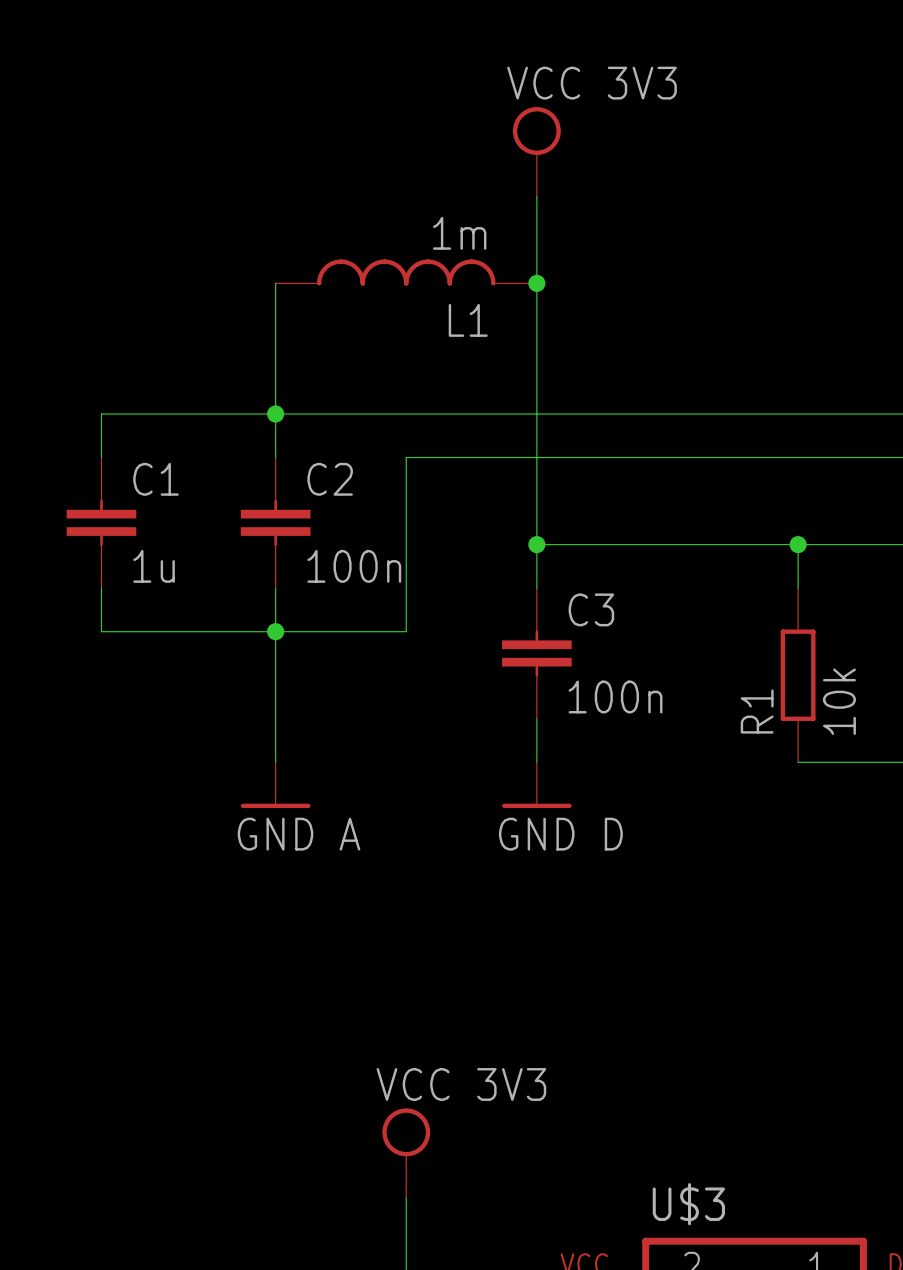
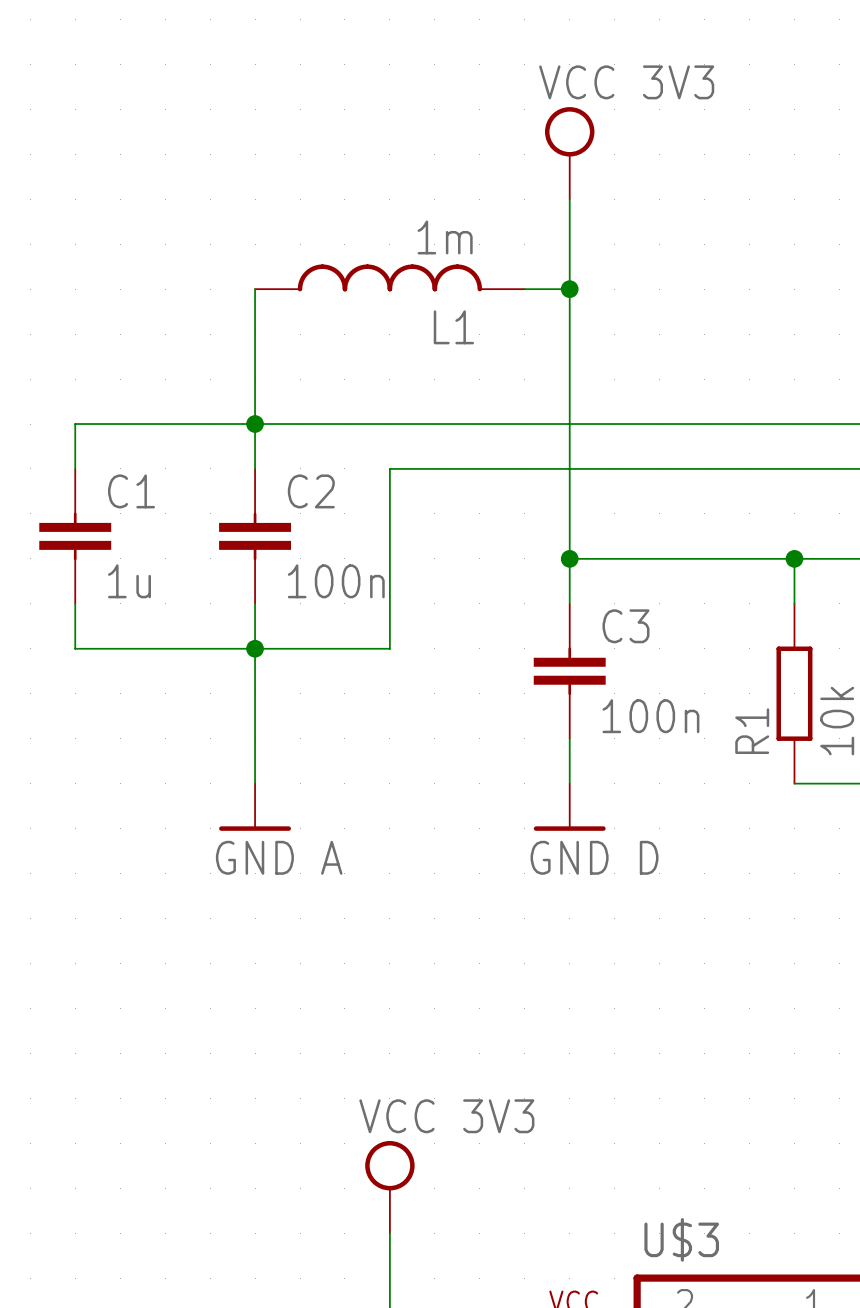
power symbol position: VCC 3V3 (536, 151) -> VCC 3V3 (569, 153)
wire: (536, 196) (536, 588) -> (569, 199) (569, 603)
junction position: (536, 283) -> (569, 289)
wire: (536, 544) (580, 544) -> (524, 289) (569, 289)
junction position: (536, 544) -> (569, 558)
C3 position: (536, 653) -> (569, 671)
wire: (536, 718) (536, 762) -> (569, 738) (569, 783)
power symbol position: GND D (536, 785) -> GND D (569, 807)

